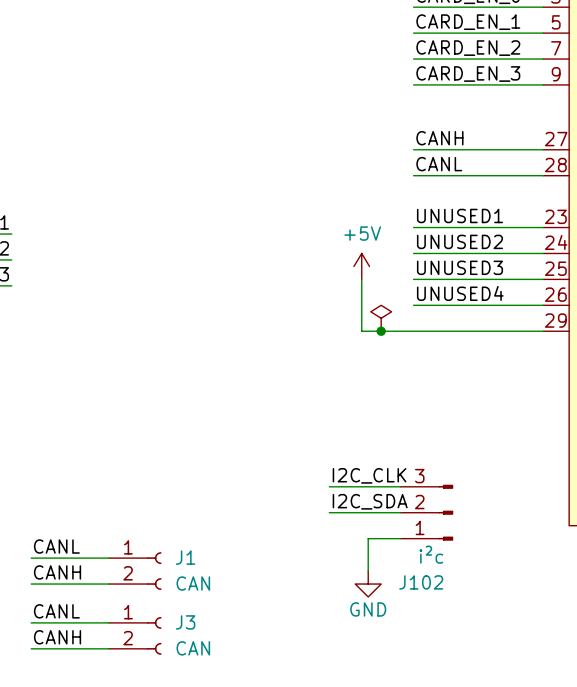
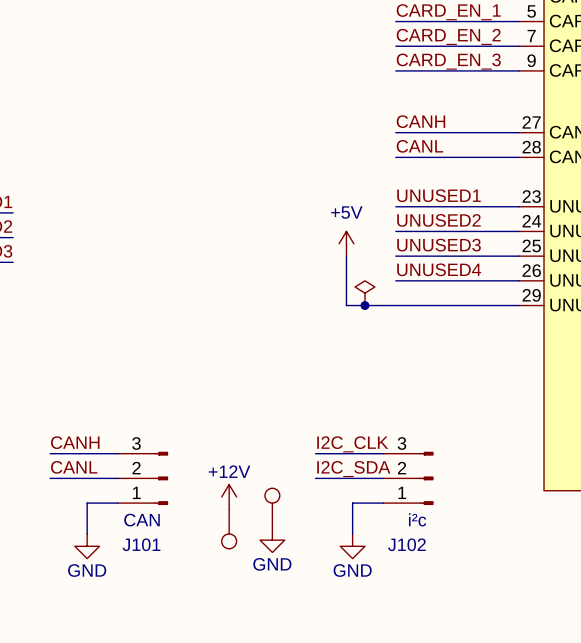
label: none -> CANH (75, 442)
wire: none -> (50, 453) (118, 453)
wire: none -> (50, 478) (118, 478)
J101: none -> CAN (143, 478)
power symbol: none -> +12V (229, 496)
wire: none -> (118, 503) (87, 503) (87, 533)
part: none -> (272, 508)
label position: CANL (56, 546) -> CANL (74, 467)
wire: (31, 558) (108, 558) -> none
part: none -> (229, 529)
J1: CAN (135, 571) -> none
label: CANH (57, 572) -> none
power symbol: none -> GND (272, 540)
wire: (31, 584) (108, 584) -> none
power symbol: none -> GND (87, 546)
label: CANL (56, 611) -> none
wire: (31, 622) (108, 622) -> none
J3: CAN (135, 635) -> none
label: CANH (57, 637) -> none
wire: (31, 648) (108, 648) -> none

